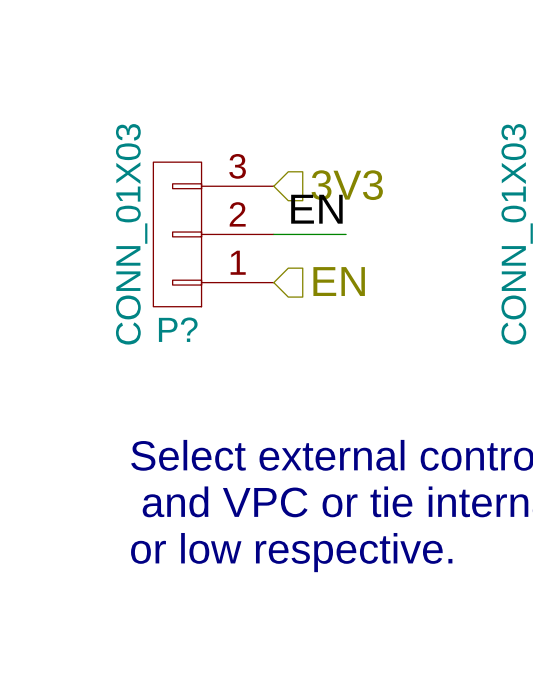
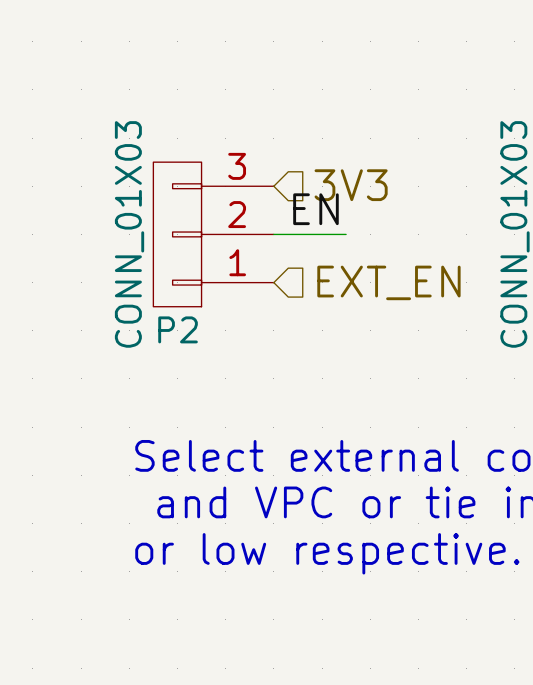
hierarchical label: EN (339, 281) -> EXT_EN (388, 282)
P? name: P? (178, 329) -> P2 (178, 329)

